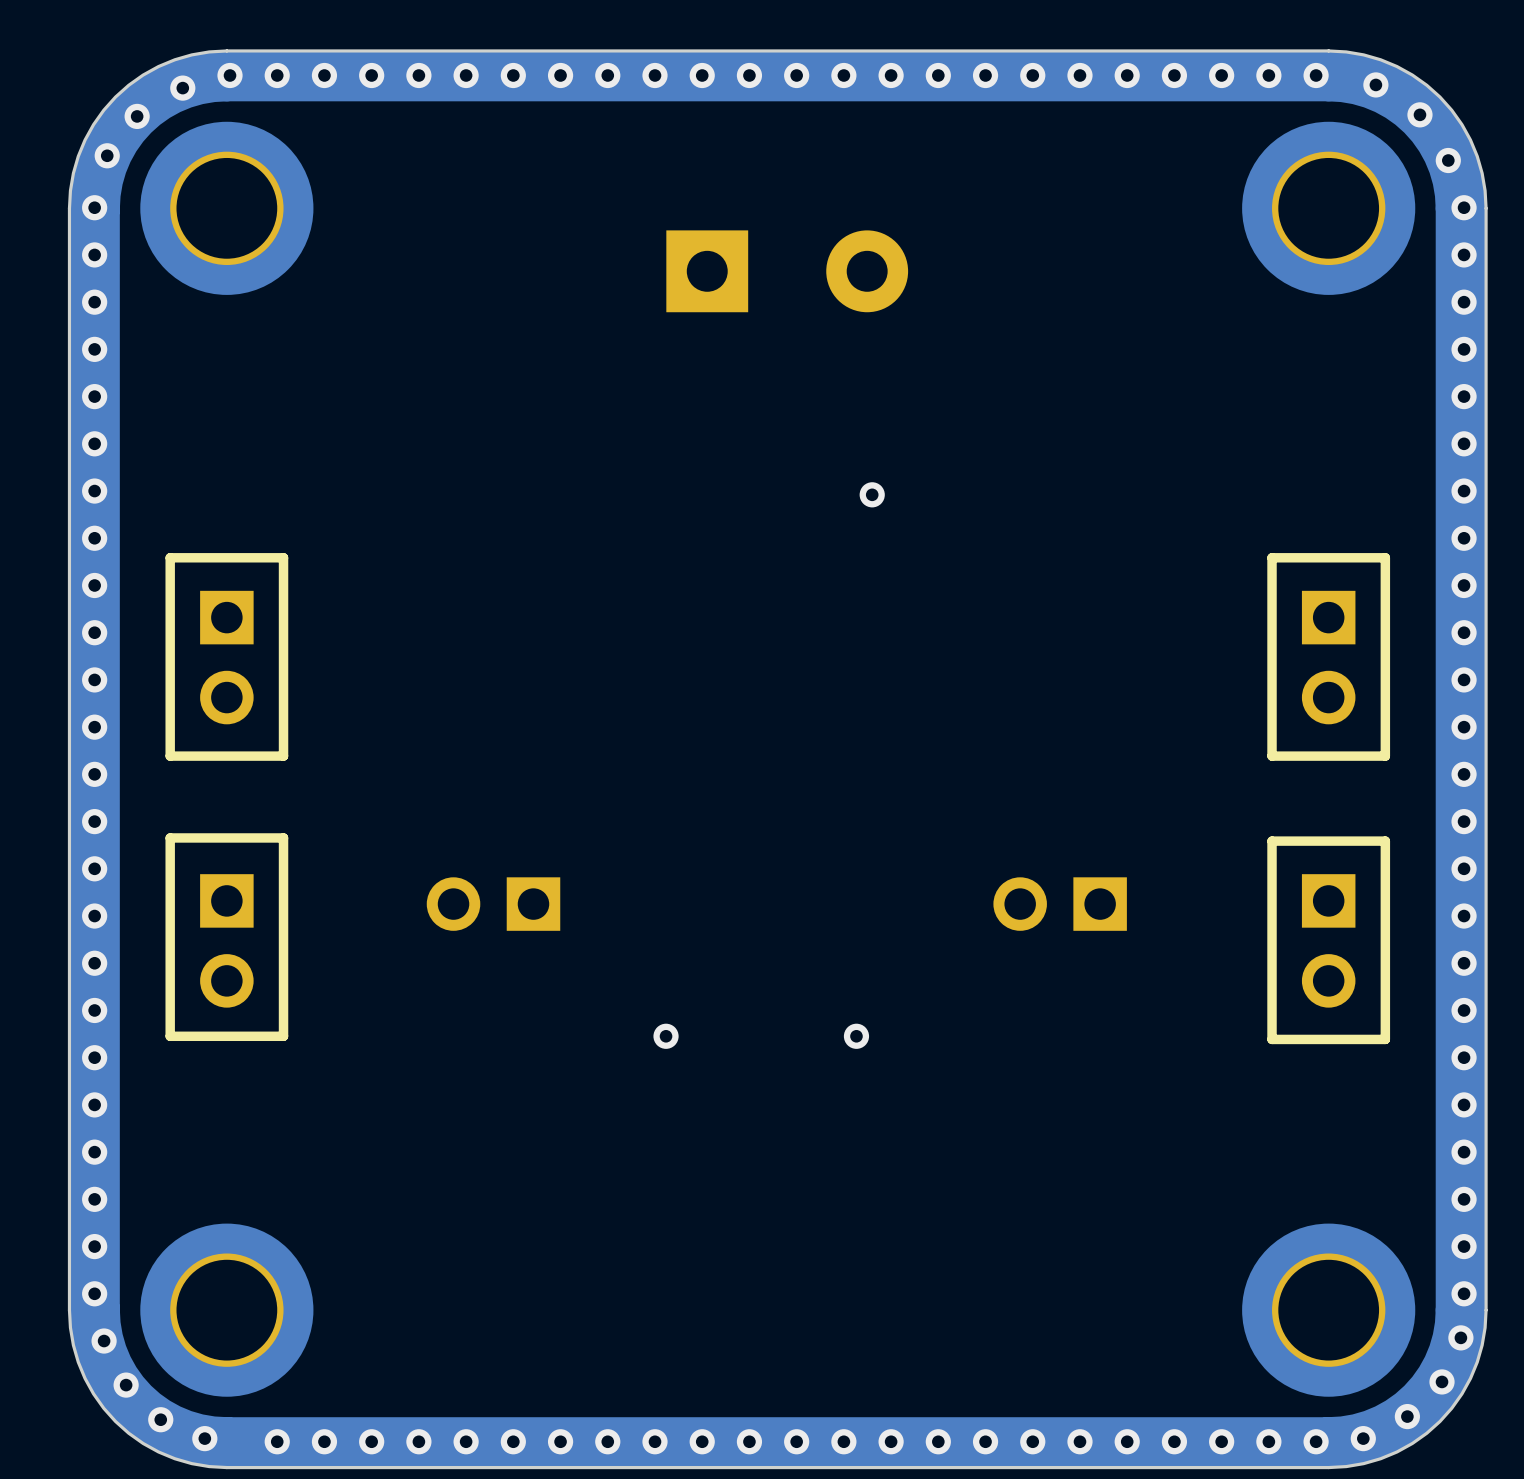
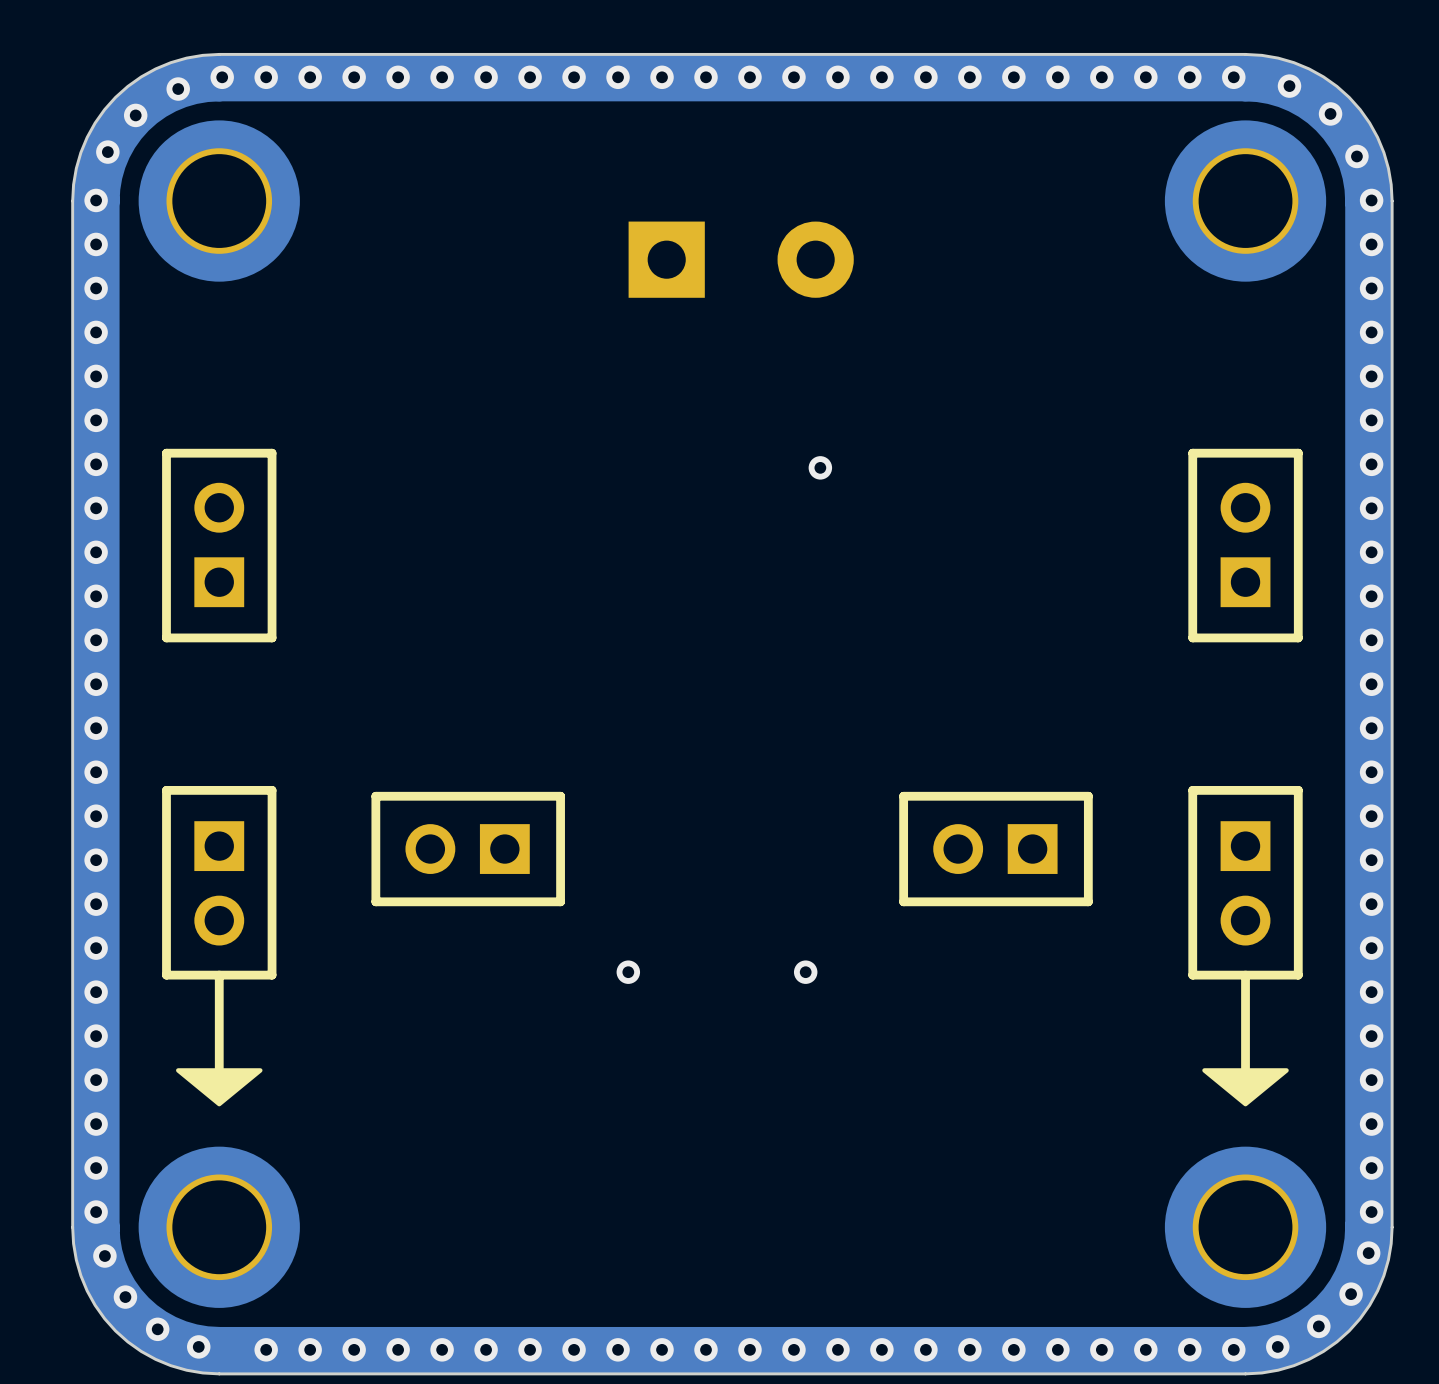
line: (283, 557) (283, 756) (170, 756) (170, 557) (283, 557) -> none
line: (1385, 557) (1272, 557) (1272, 756) (1385, 756) (1385, 557) -> none
part: none -> (219, 545)
part: none -> (1245, 545)
part: (226, 657) -> none
part: (1328, 657) -> none
line: (283, 837) (283, 1036) (170, 1036) (170, 837) (283, 837) -> none
line: (1385, 841) (1272, 841) (1272, 1039) (1385, 1039) (1385, 841) -> none
part footprint: [200, 874, 254, 1008] -> [162, 786, 277, 980]
part footprint: [1301, 874, 1356, 1008] -> [1188, 786, 1303, 980]
part footprint: [426, 877, 561, 931] -> [371, 791, 565, 907]
part footprint: [993, 877, 1127, 931] -> [899, 791, 1093, 907]
line: none -> (219, 975) (219, 1068)
line: none -> (1245, 975) (1245, 1068)
drawing: none -> [176, 1068, 263, 1107]
drawing: none -> [1202, 1068, 1289, 1107]

